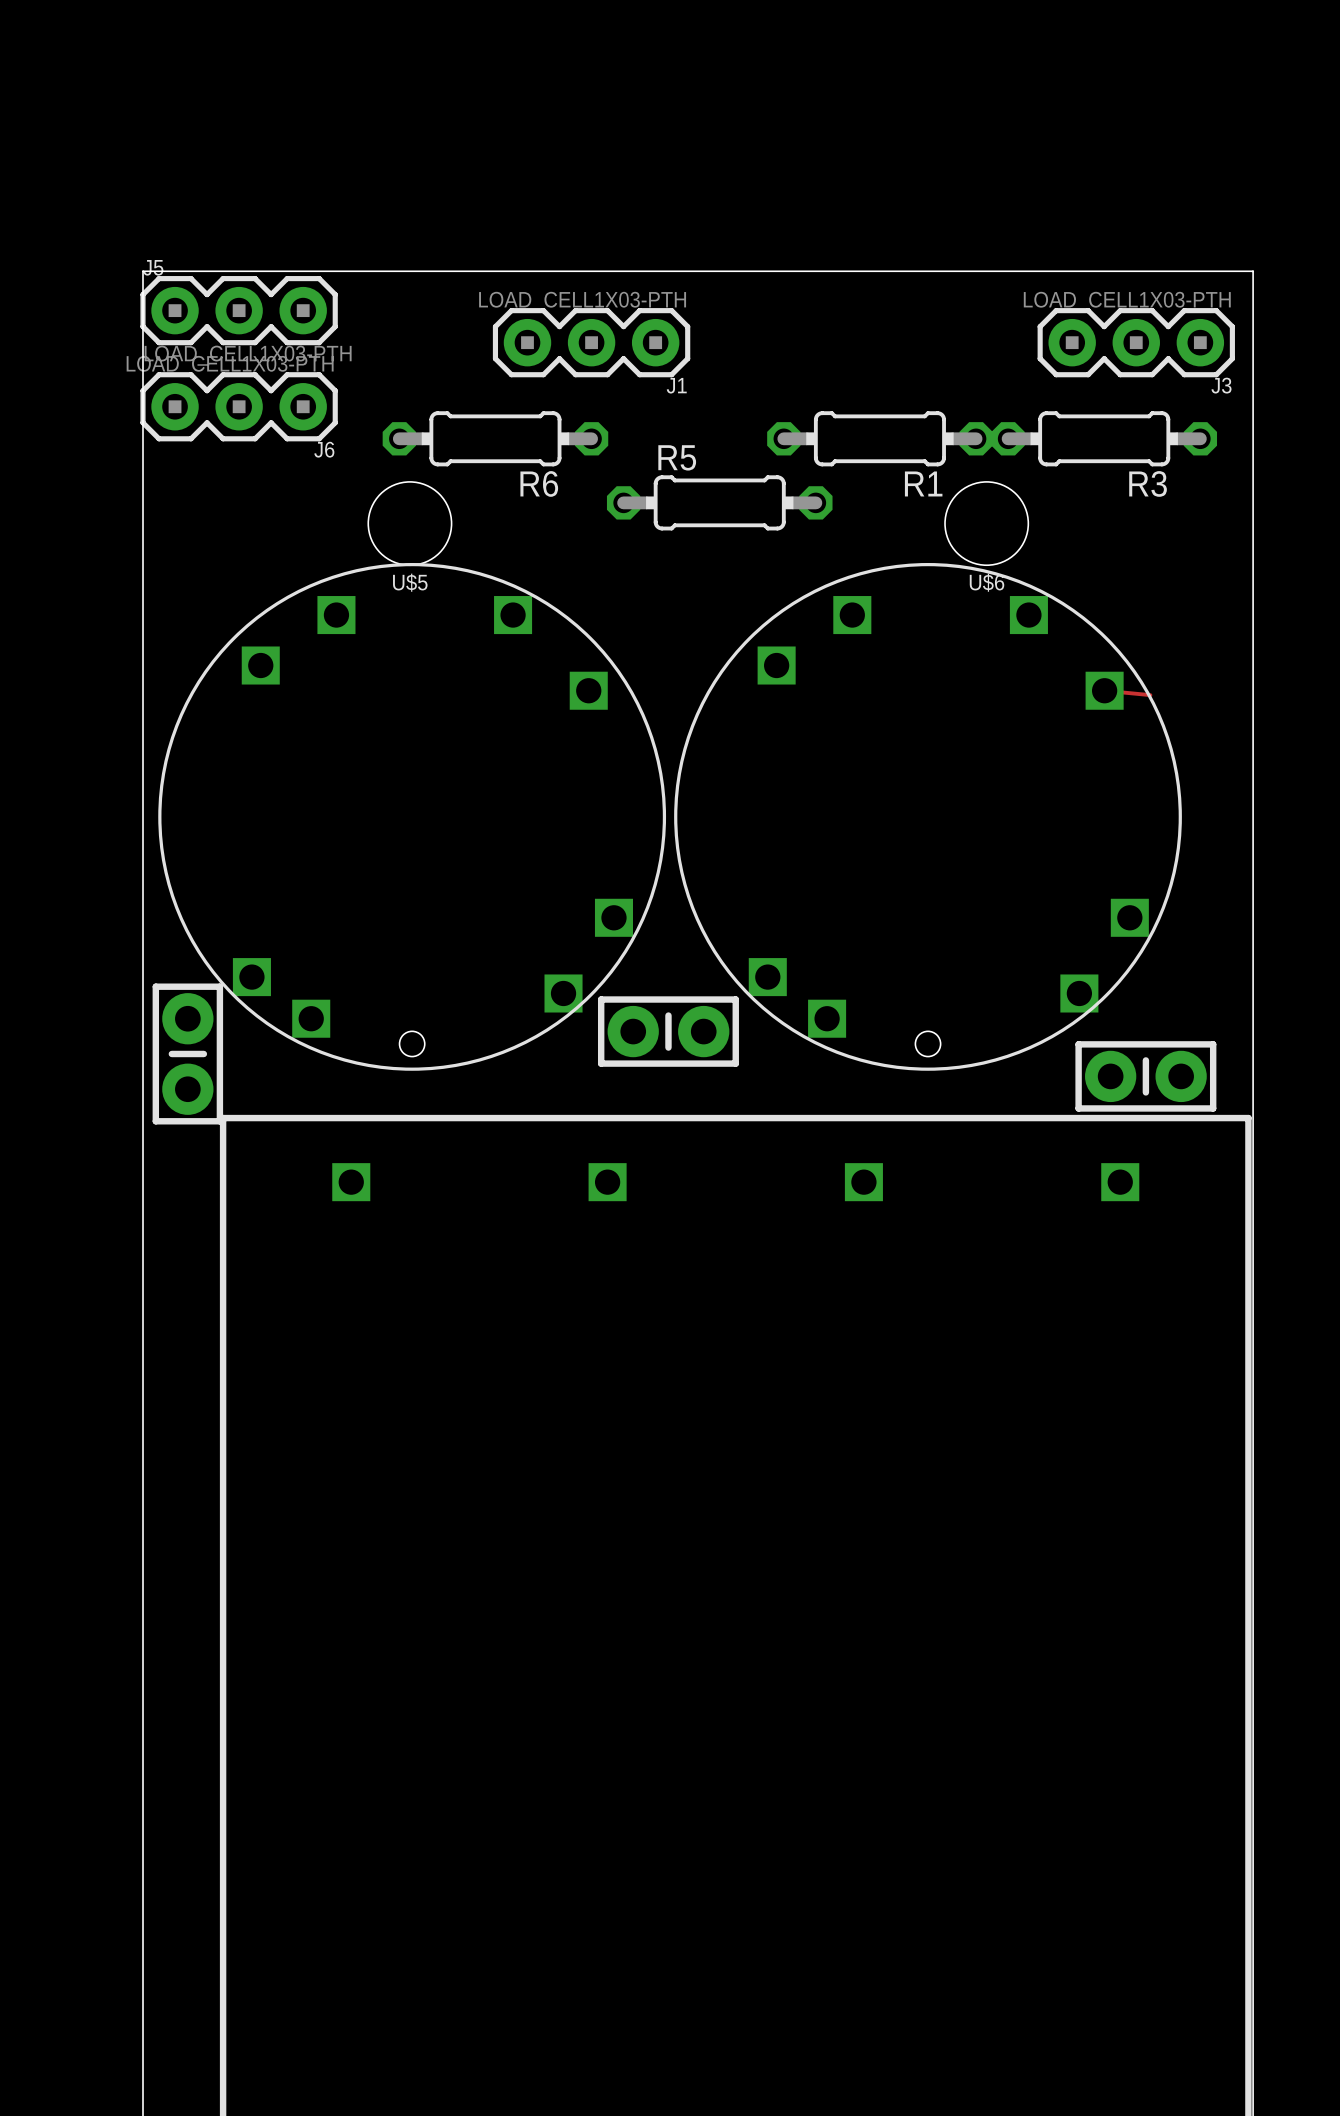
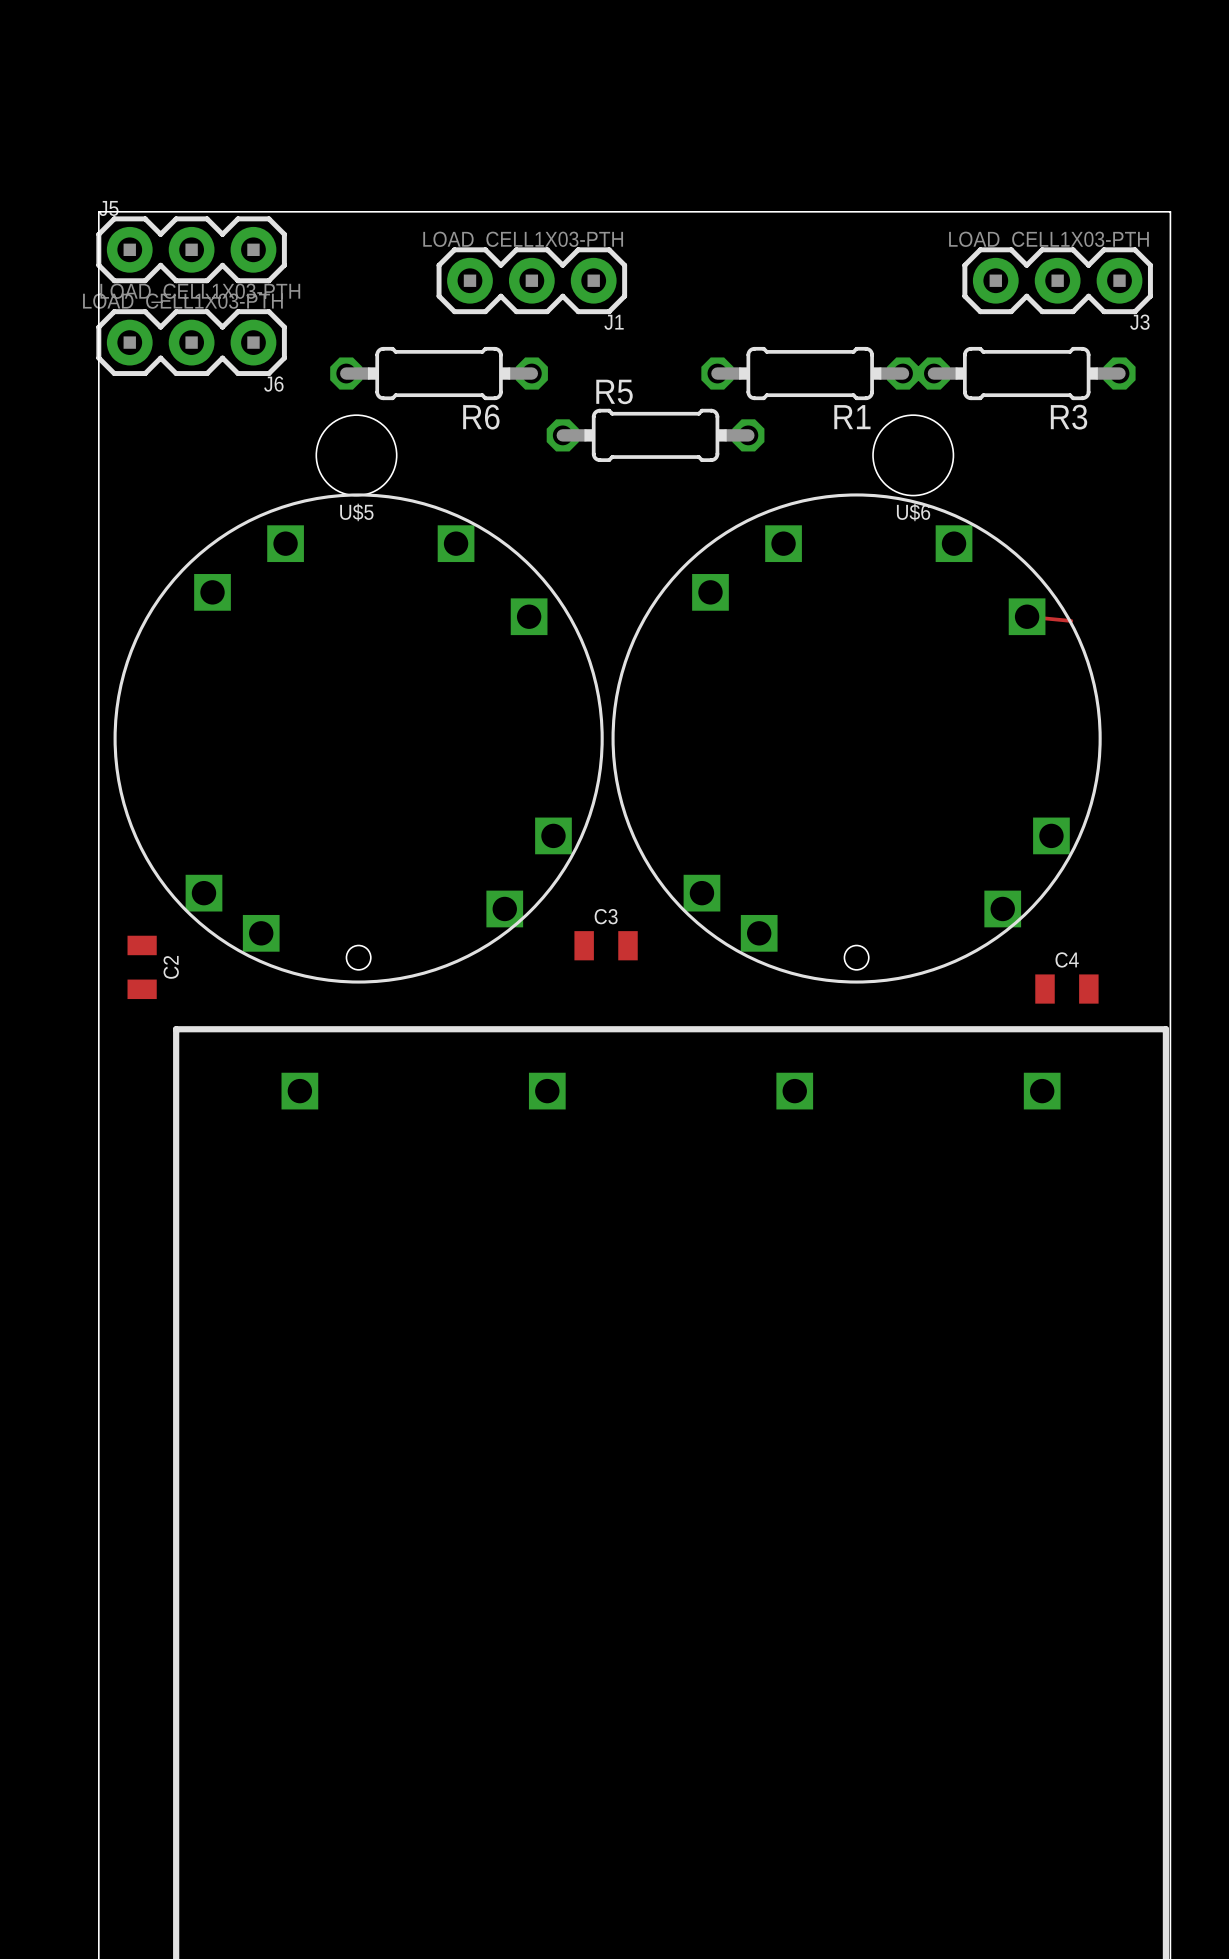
part: (668, 1031) -> none
C3: none -> (606, 945)
part: (187, 1053) -> none
C2: none -> (142, 967)
part: (1145, 1076) -> none
C4: none -> (1066, 989)

